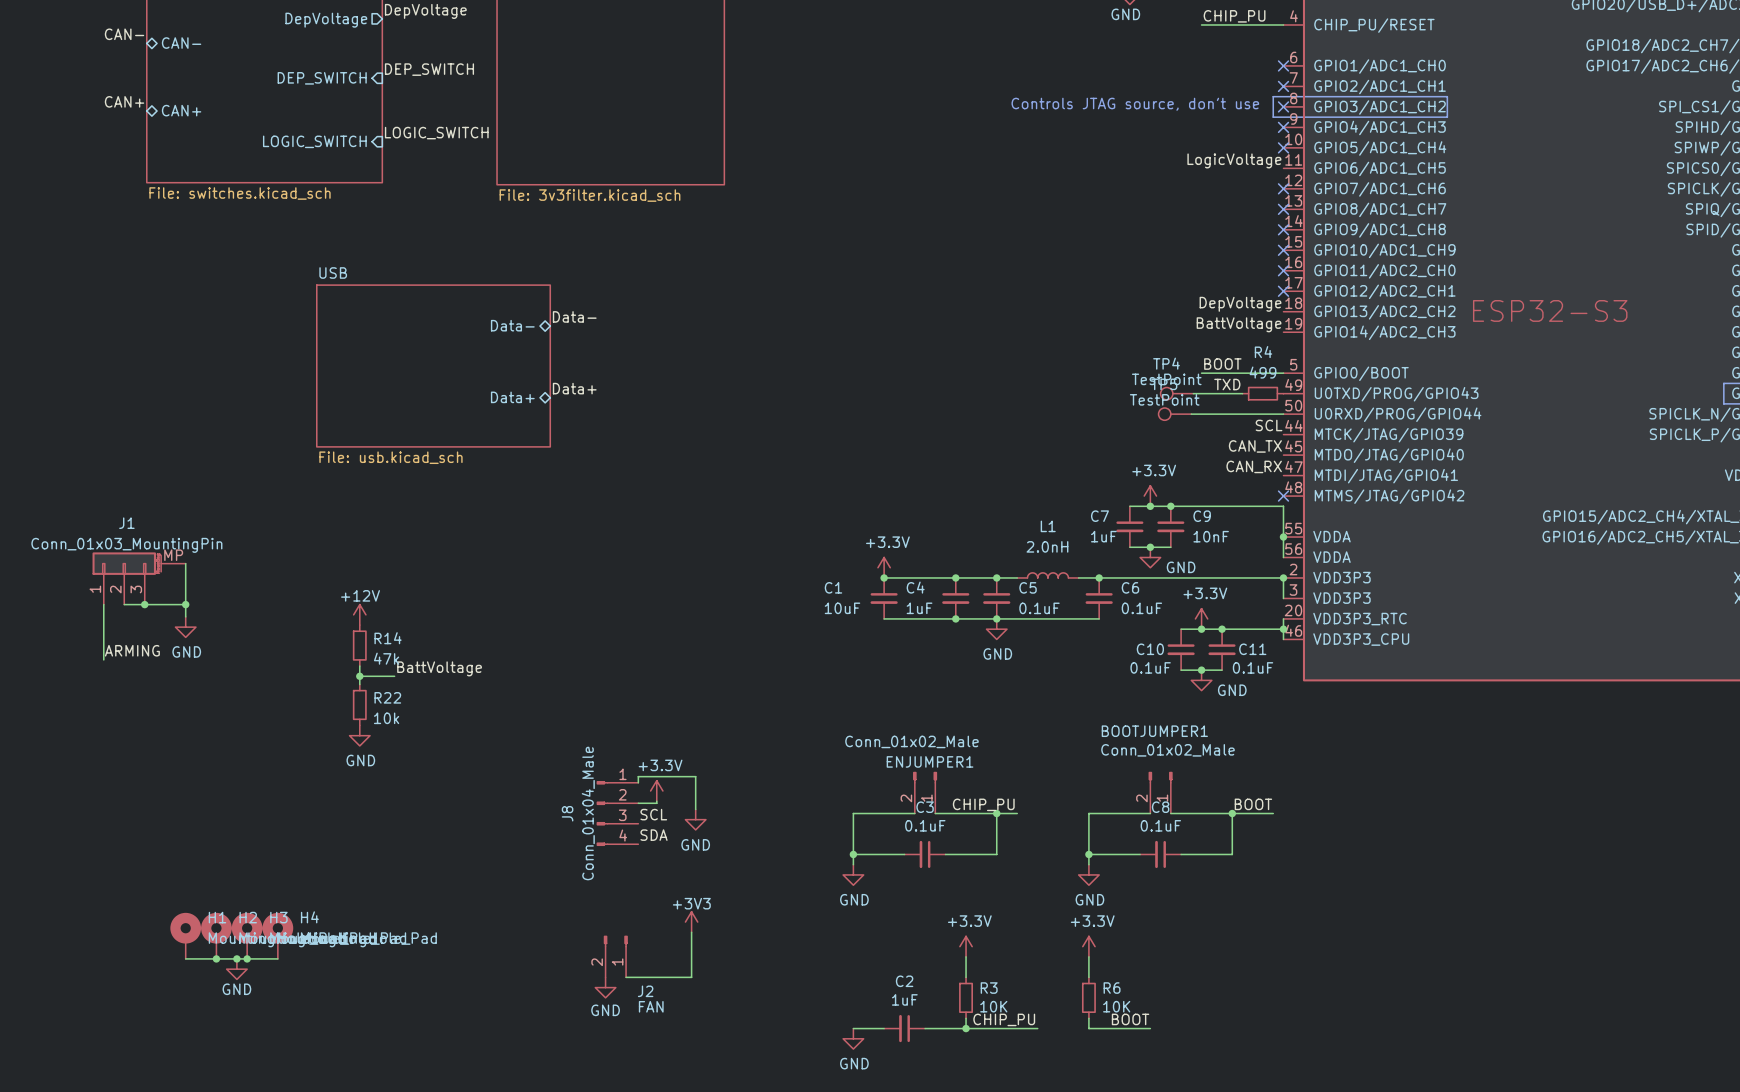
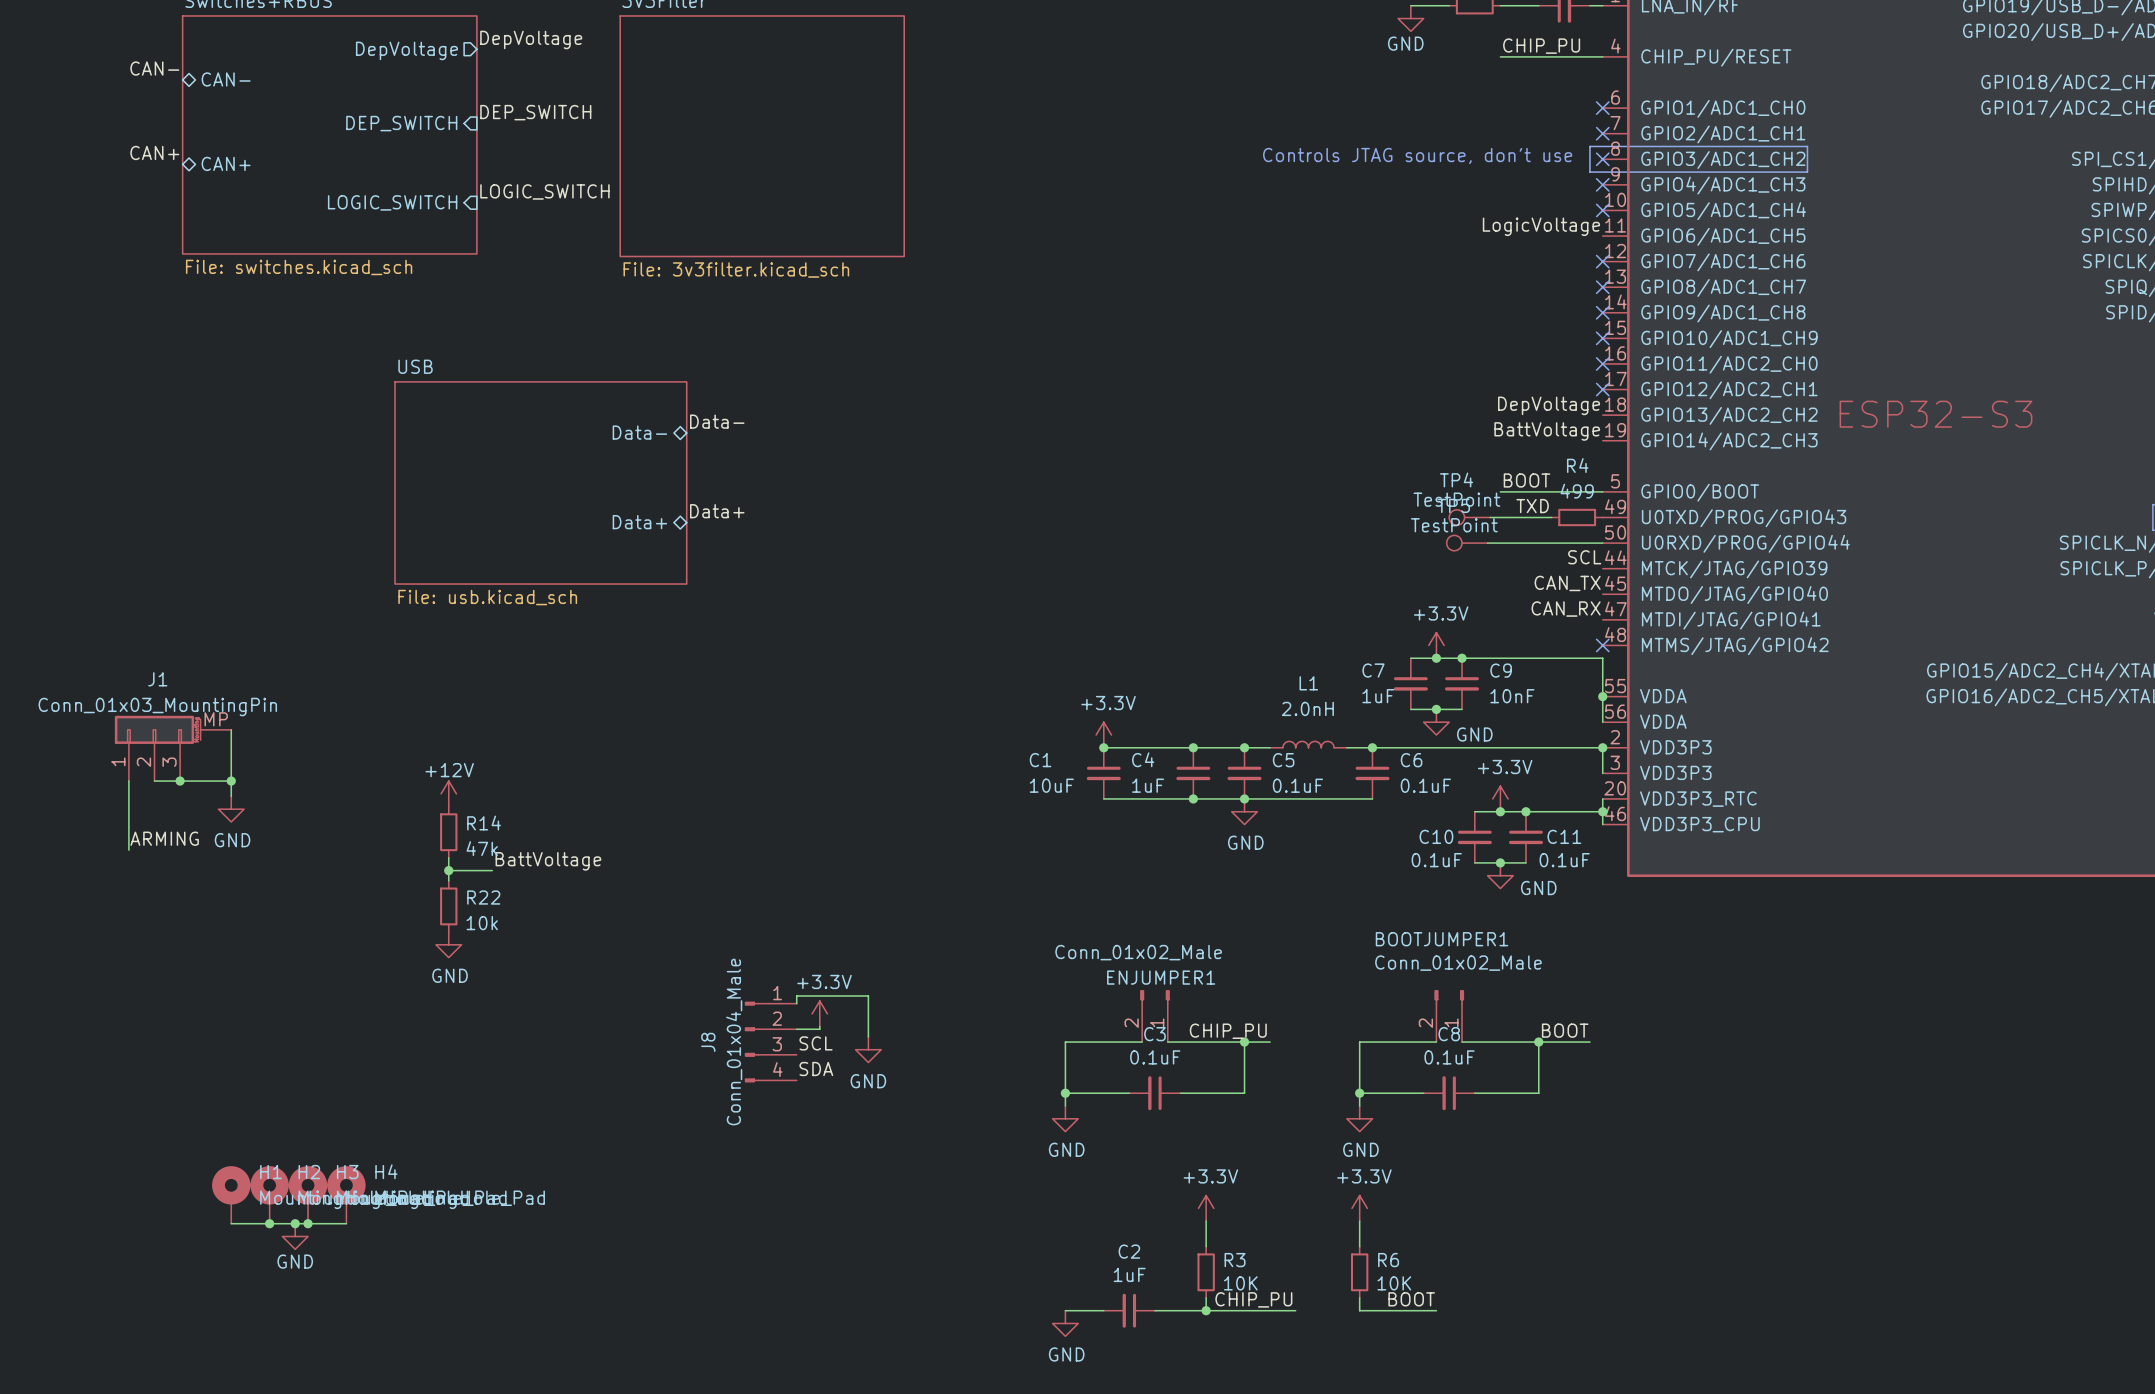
power symbol: +3V3 (691, 922) -> none
wire: (691, 932) (691, 977) (626, 977) -> none
J2: FAN (615, 956) -> none
power symbol: GND (605, 987) -> none

